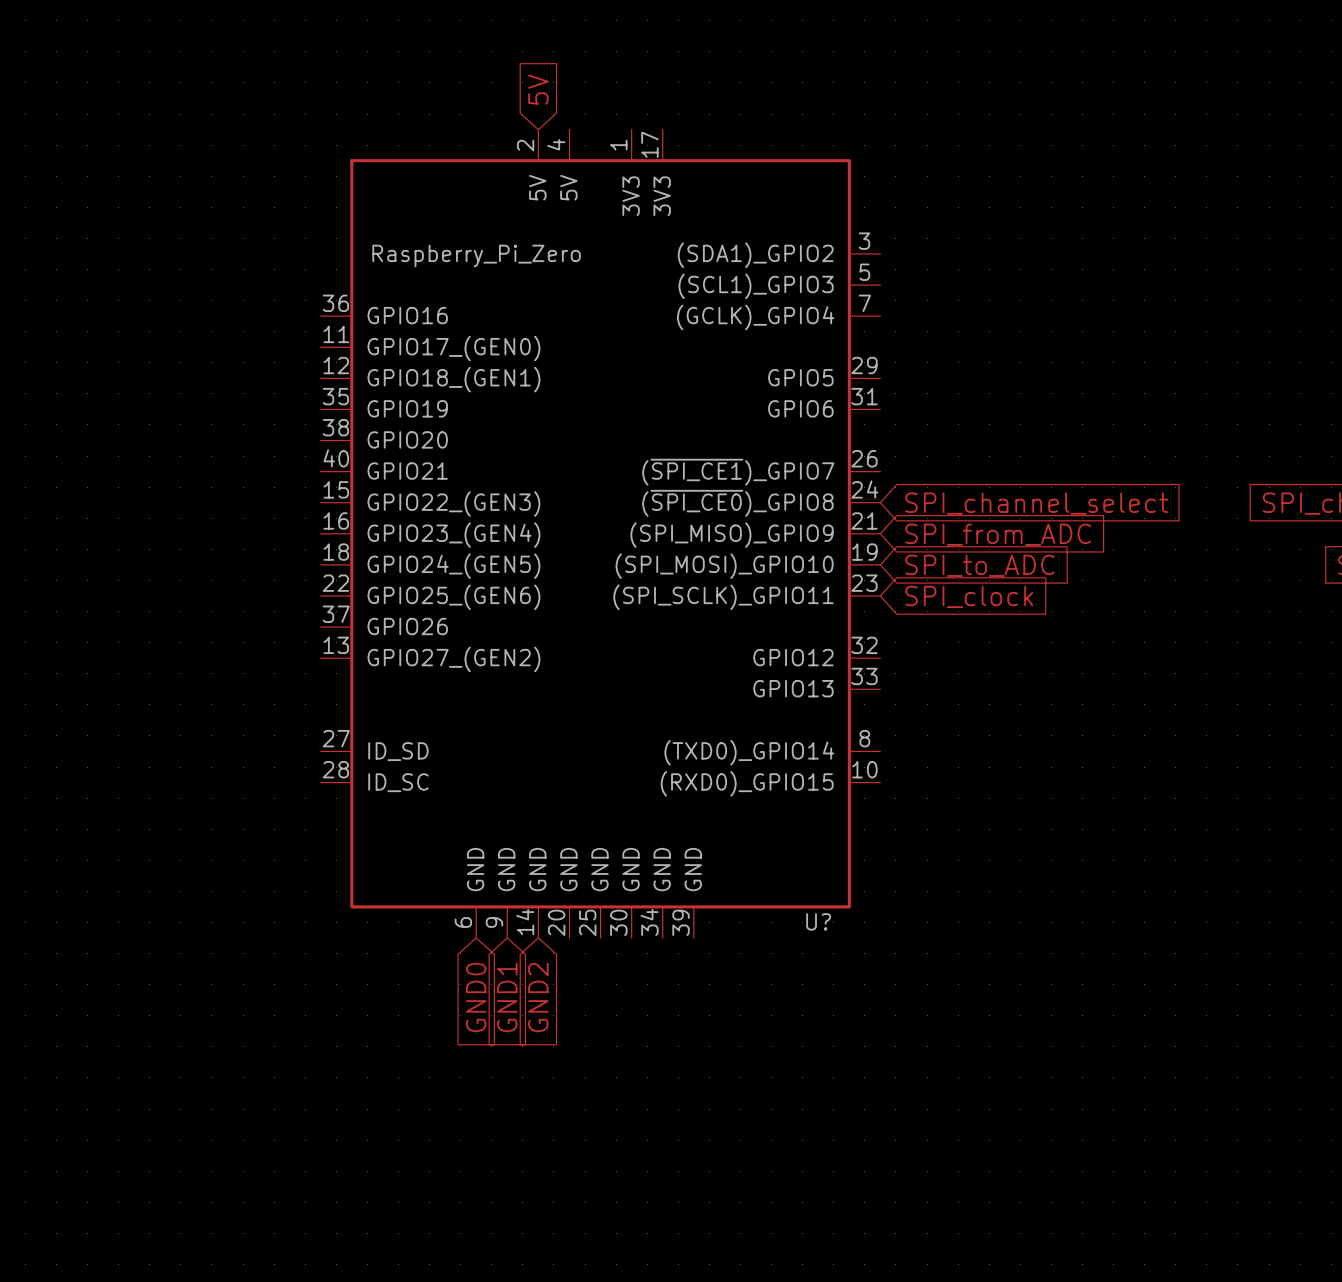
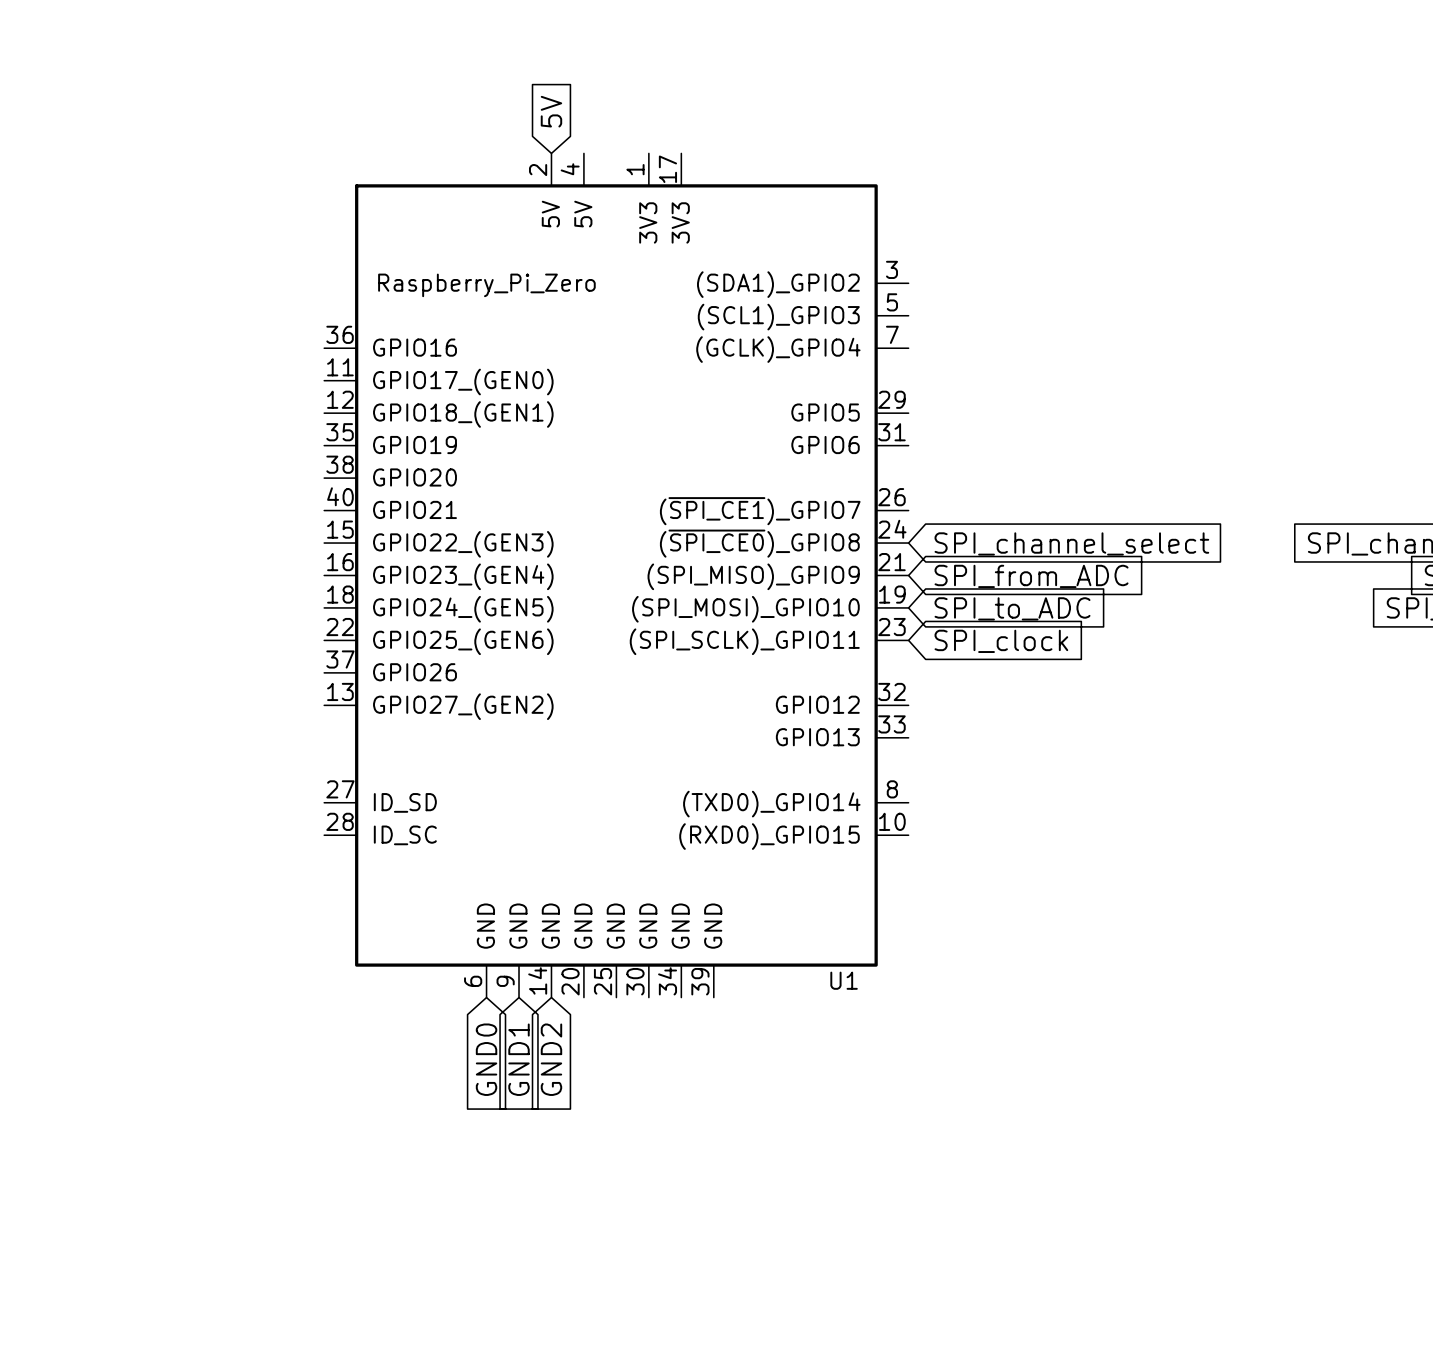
U? name: U? (818, 921) -> U1 (844, 980)

